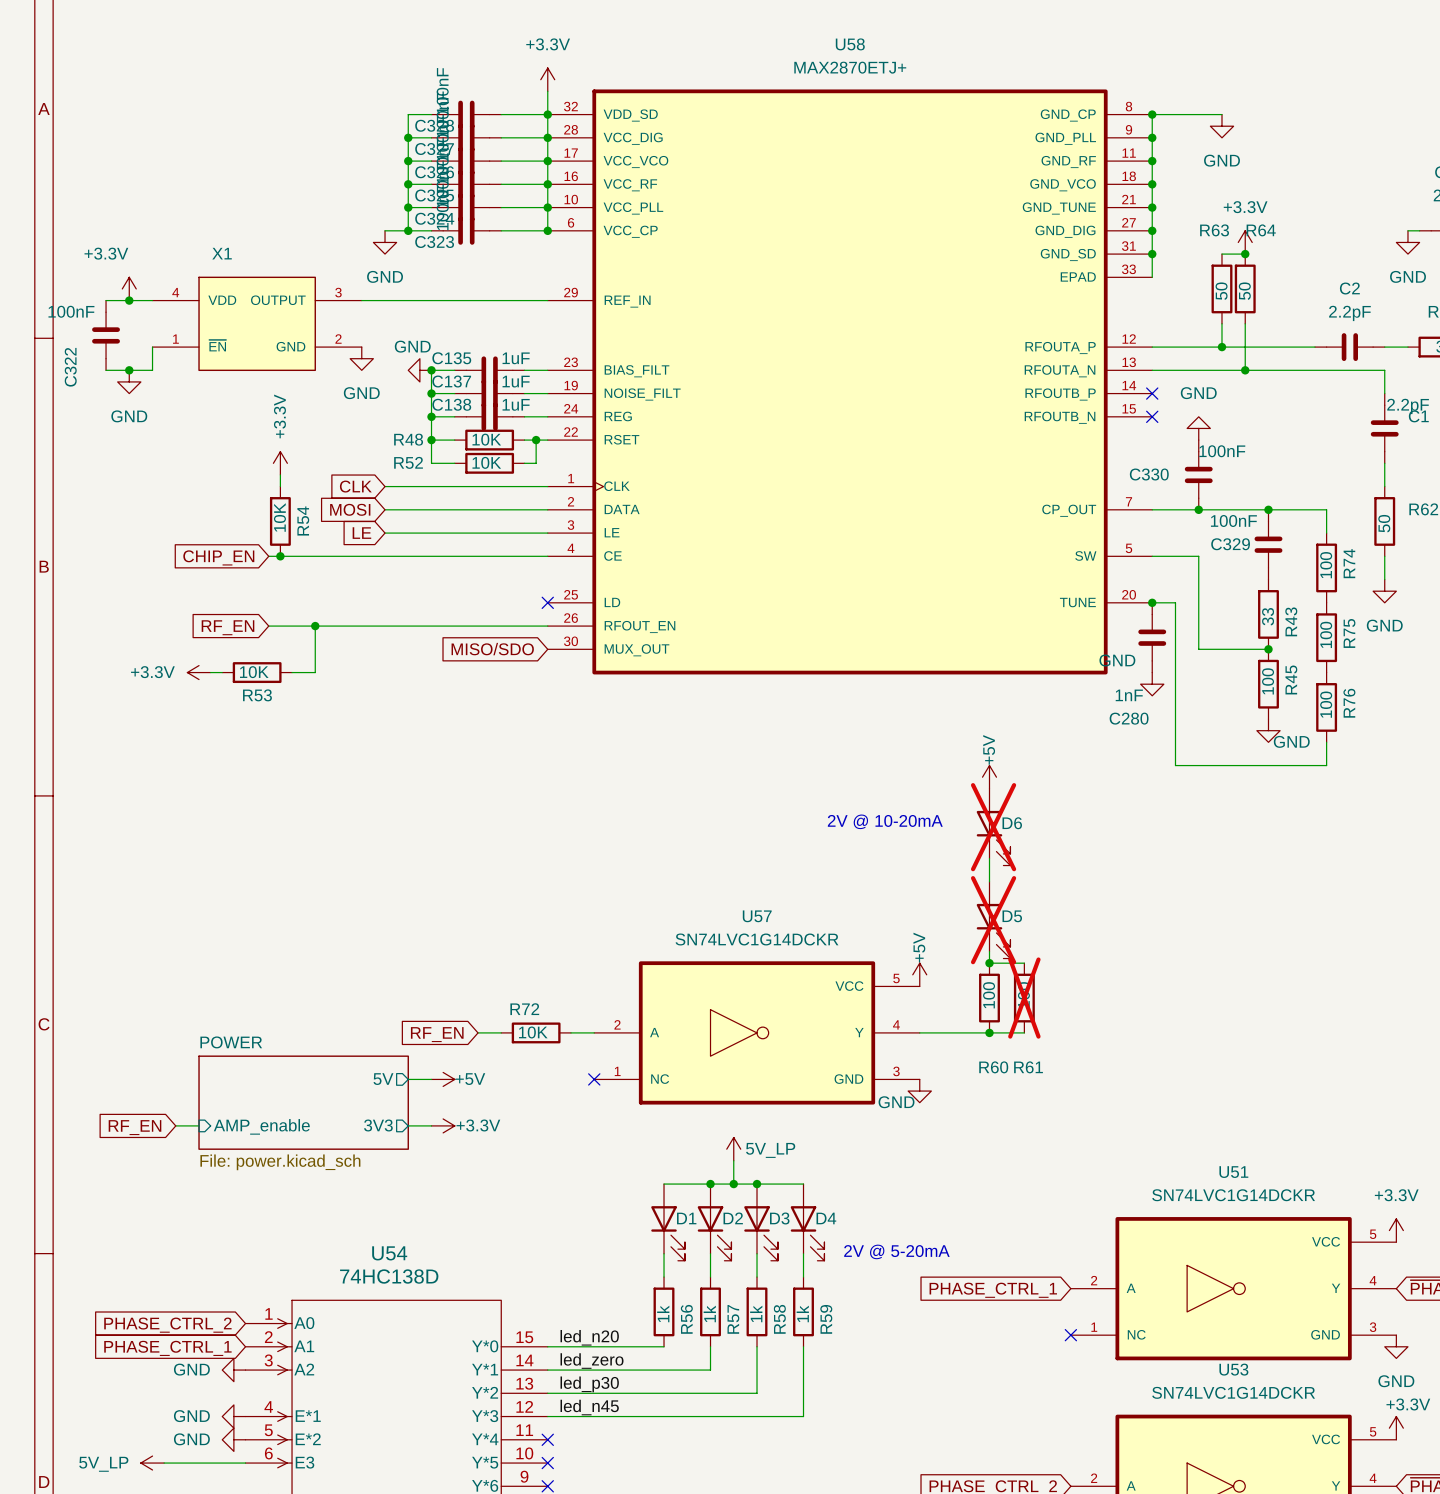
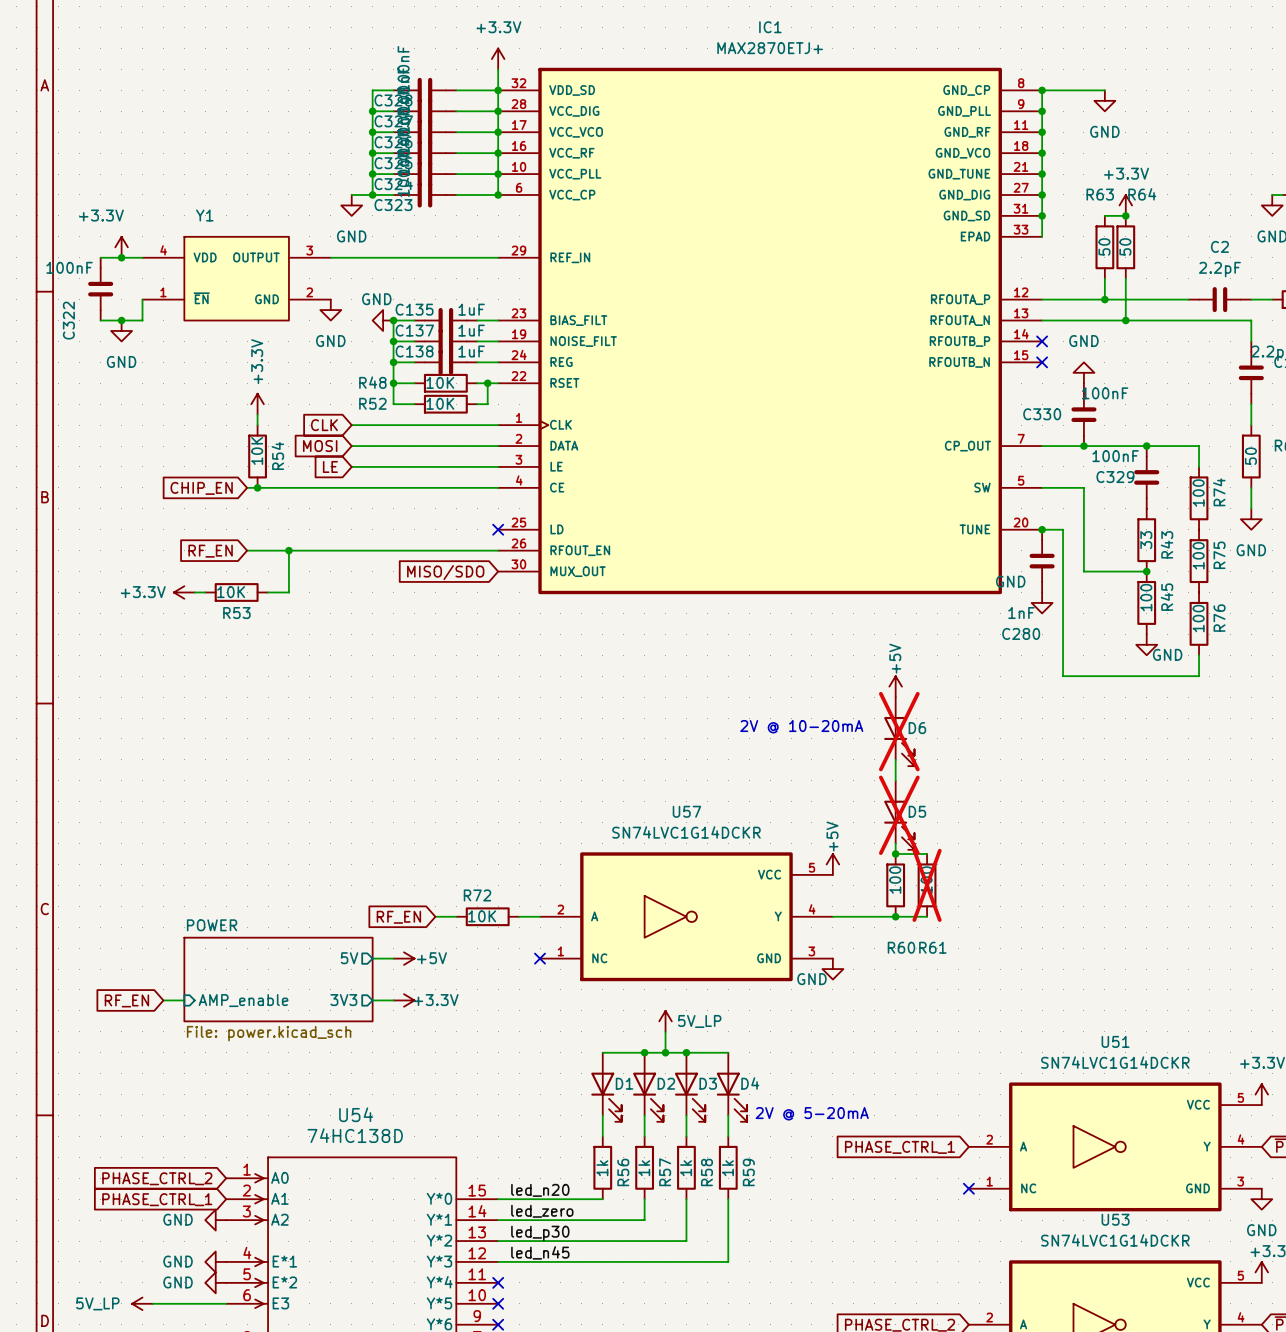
U58 name: U58 (850, 44) -> IC1 (770, 27)
X1 name: X1 (222, 253) -> Y1 (204, 215)

